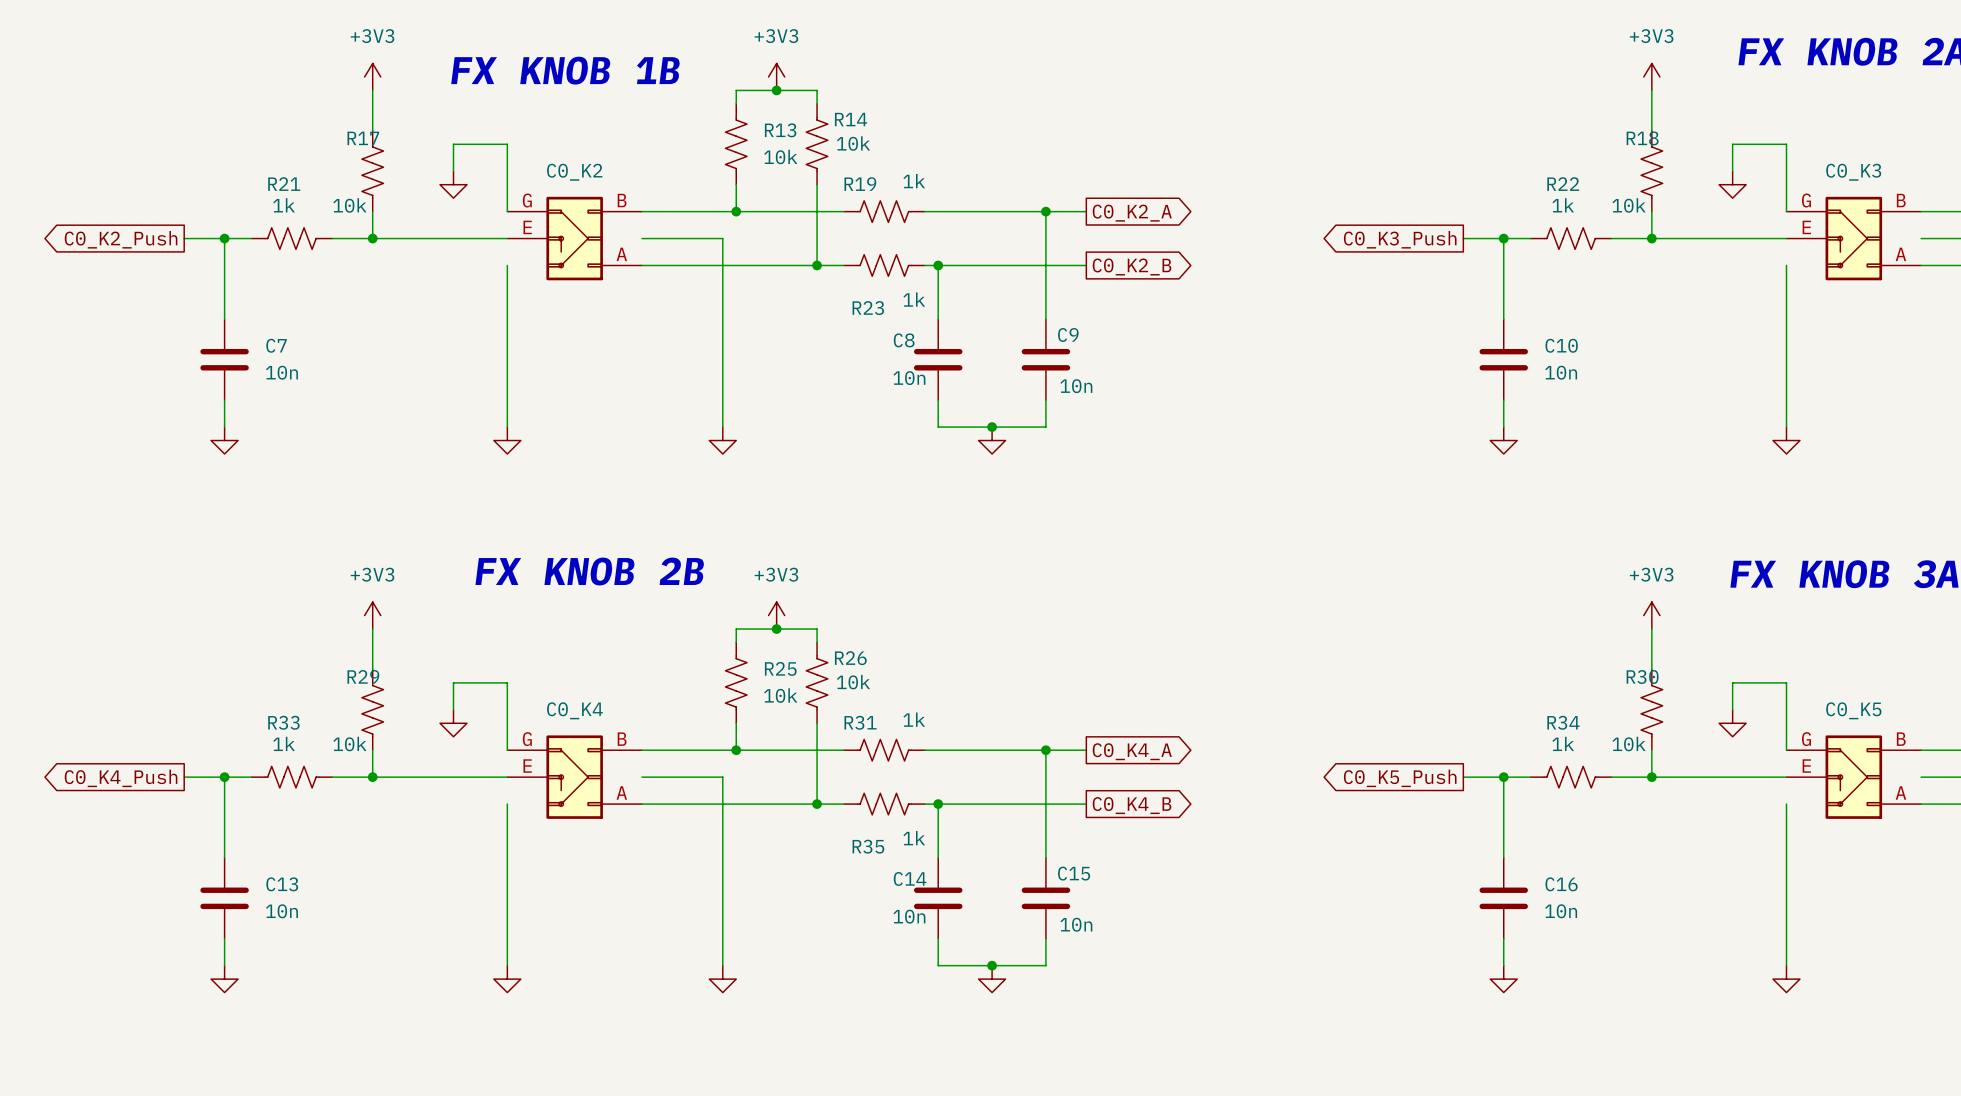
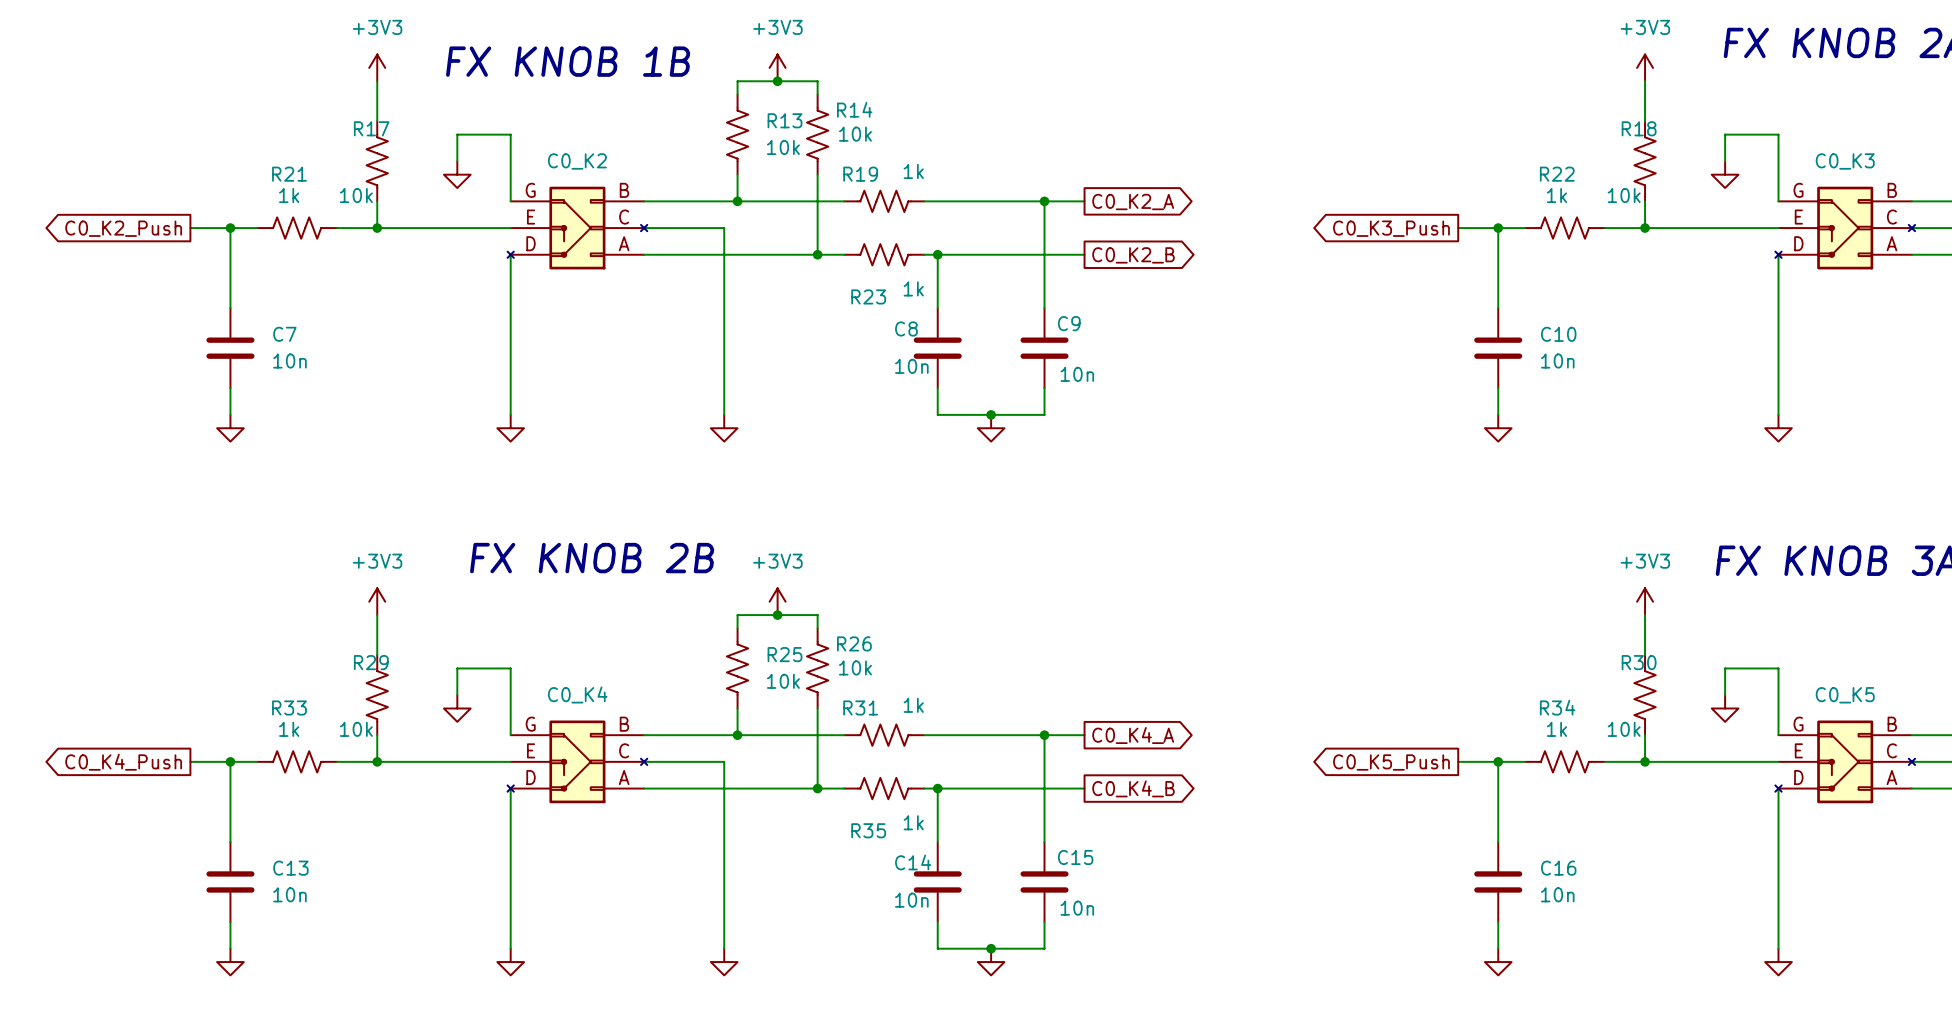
part symbol: [507, 196, 642, 281] -> [507, 186, 648, 270]
part symbol: [1786, 196, 1922, 281] -> [1775, 186, 1916, 270]
part symbol: [507, 735, 642, 819] -> [507, 720, 648, 804]
part symbol: [1786, 735, 1922, 819] -> [1775, 720, 1916, 804]

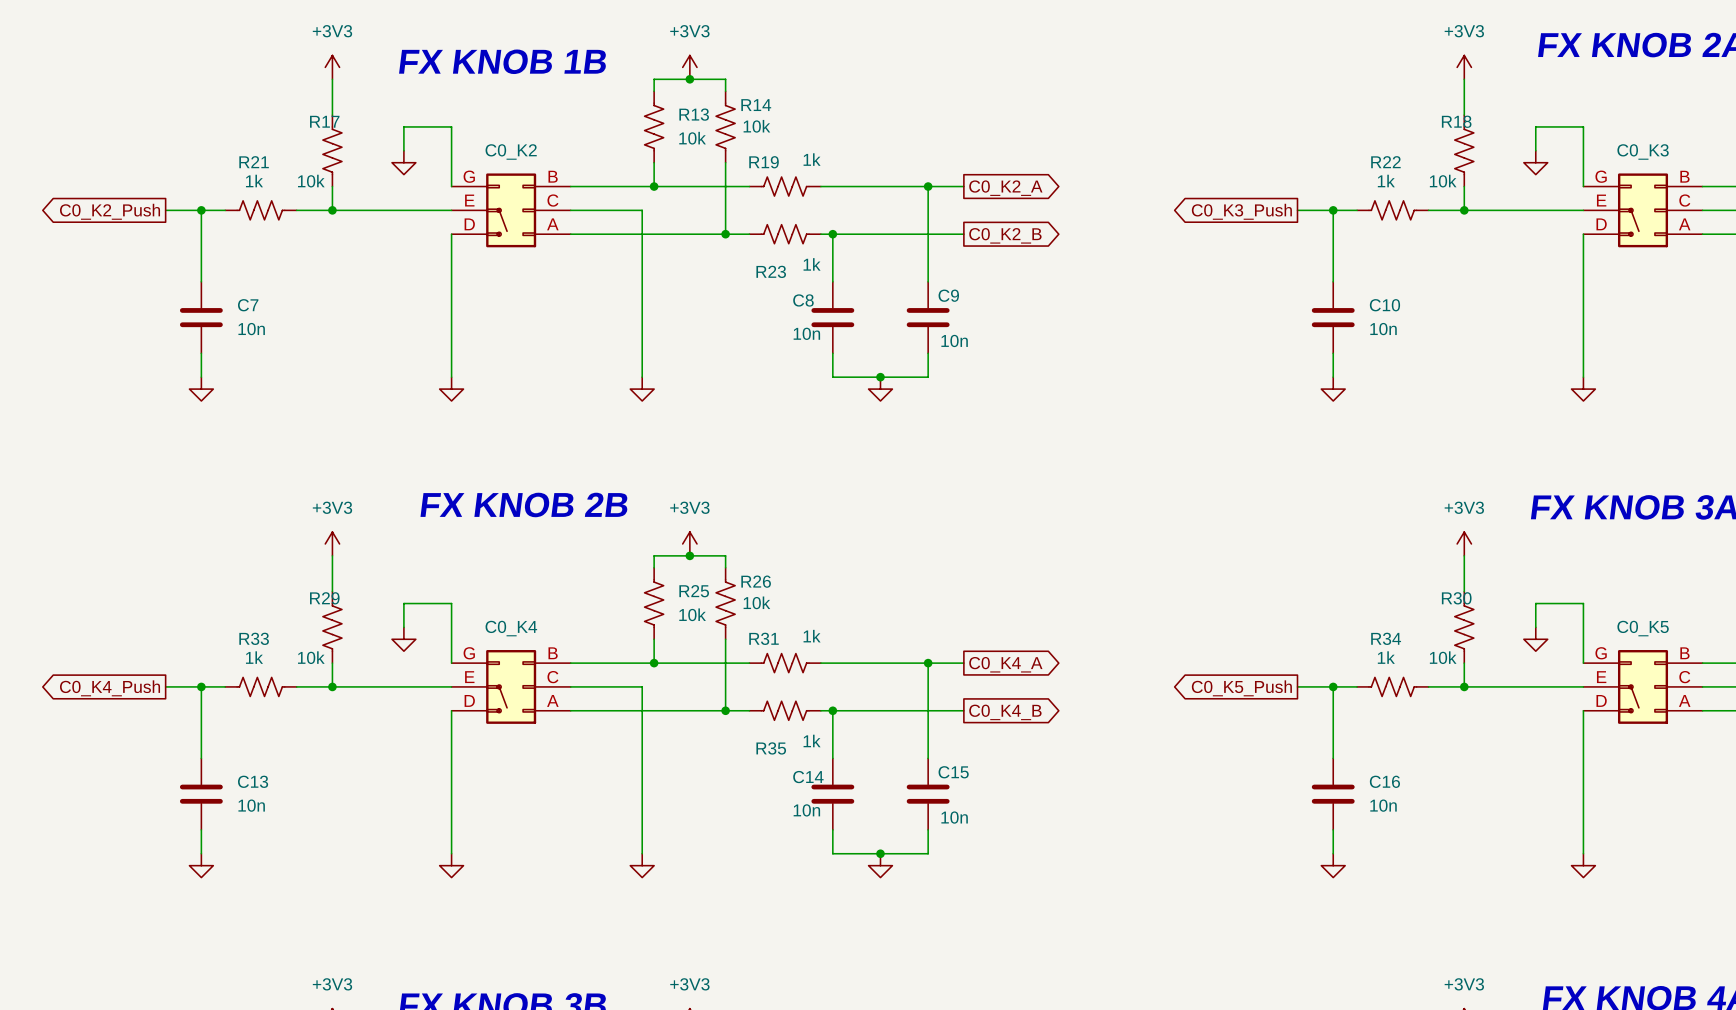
part symbol: [507, 186, 648, 270] -> [451, 173, 571, 248]
part symbol: [1775, 186, 1916, 270] -> [1583, 173, 1703, 248]
part symbol: [507, 720, 648, 804] -> [451, 650, 571, 724]
part symbol: [1775, 720, 1916, 804] -> [1583, 650, 1703, 724]

